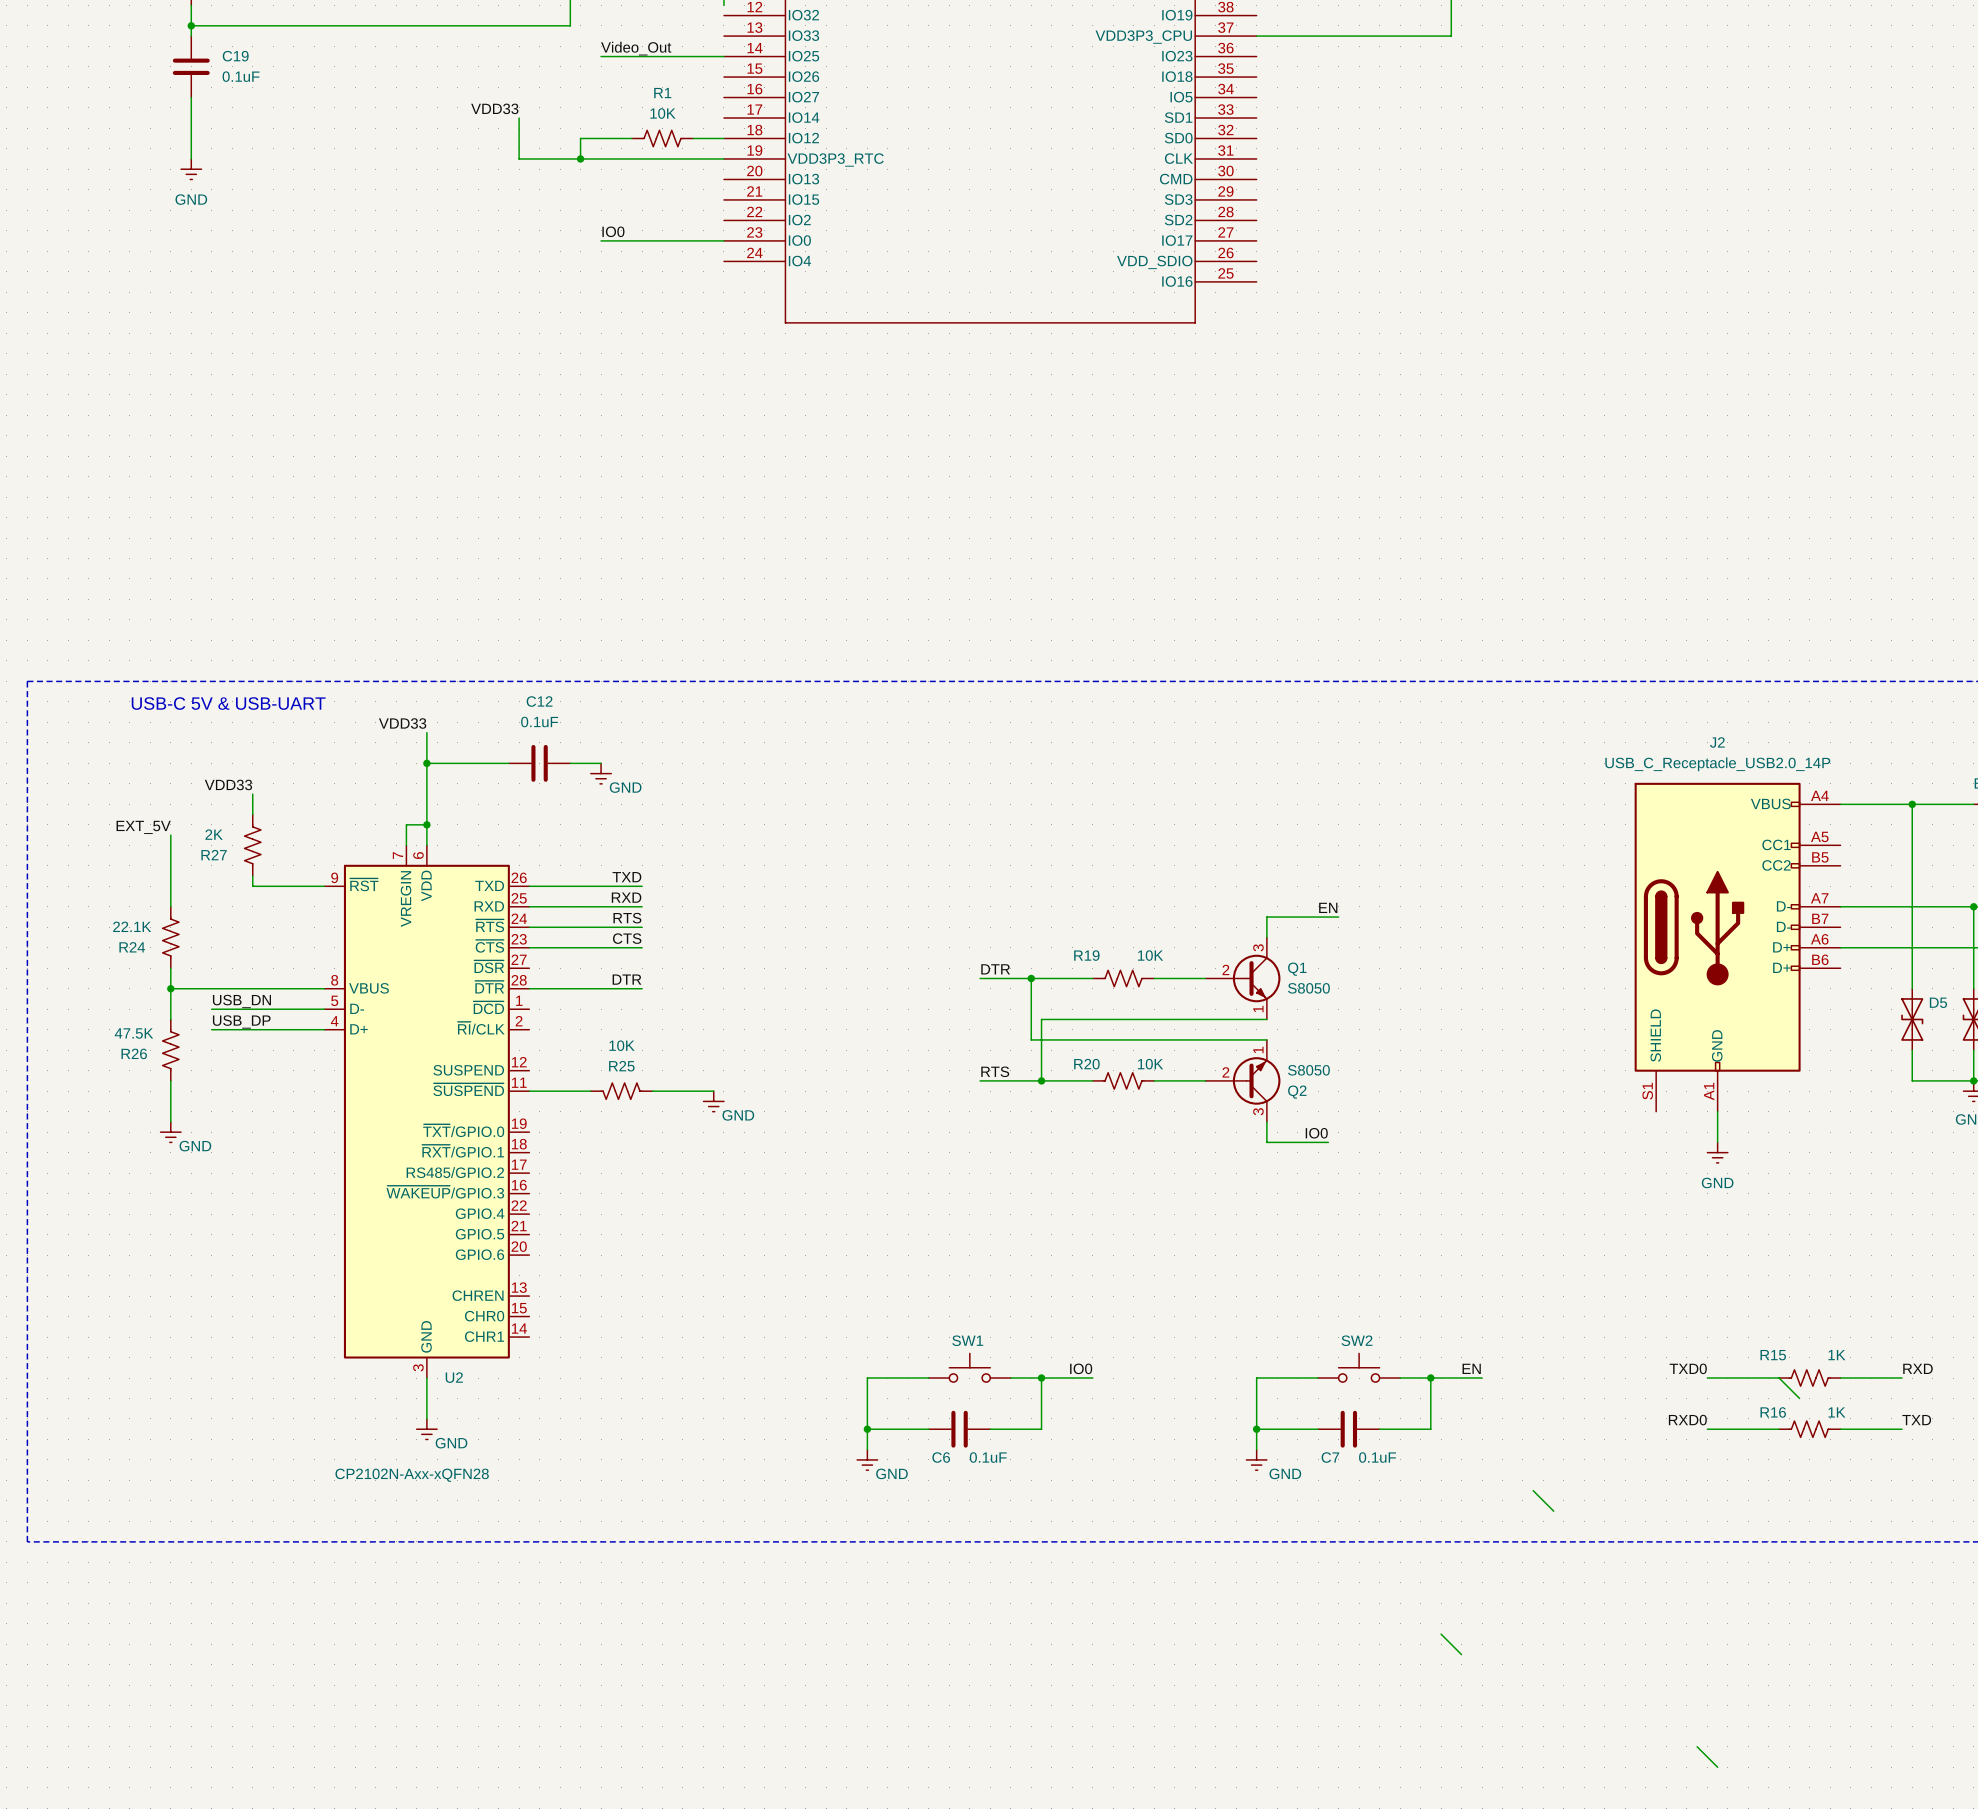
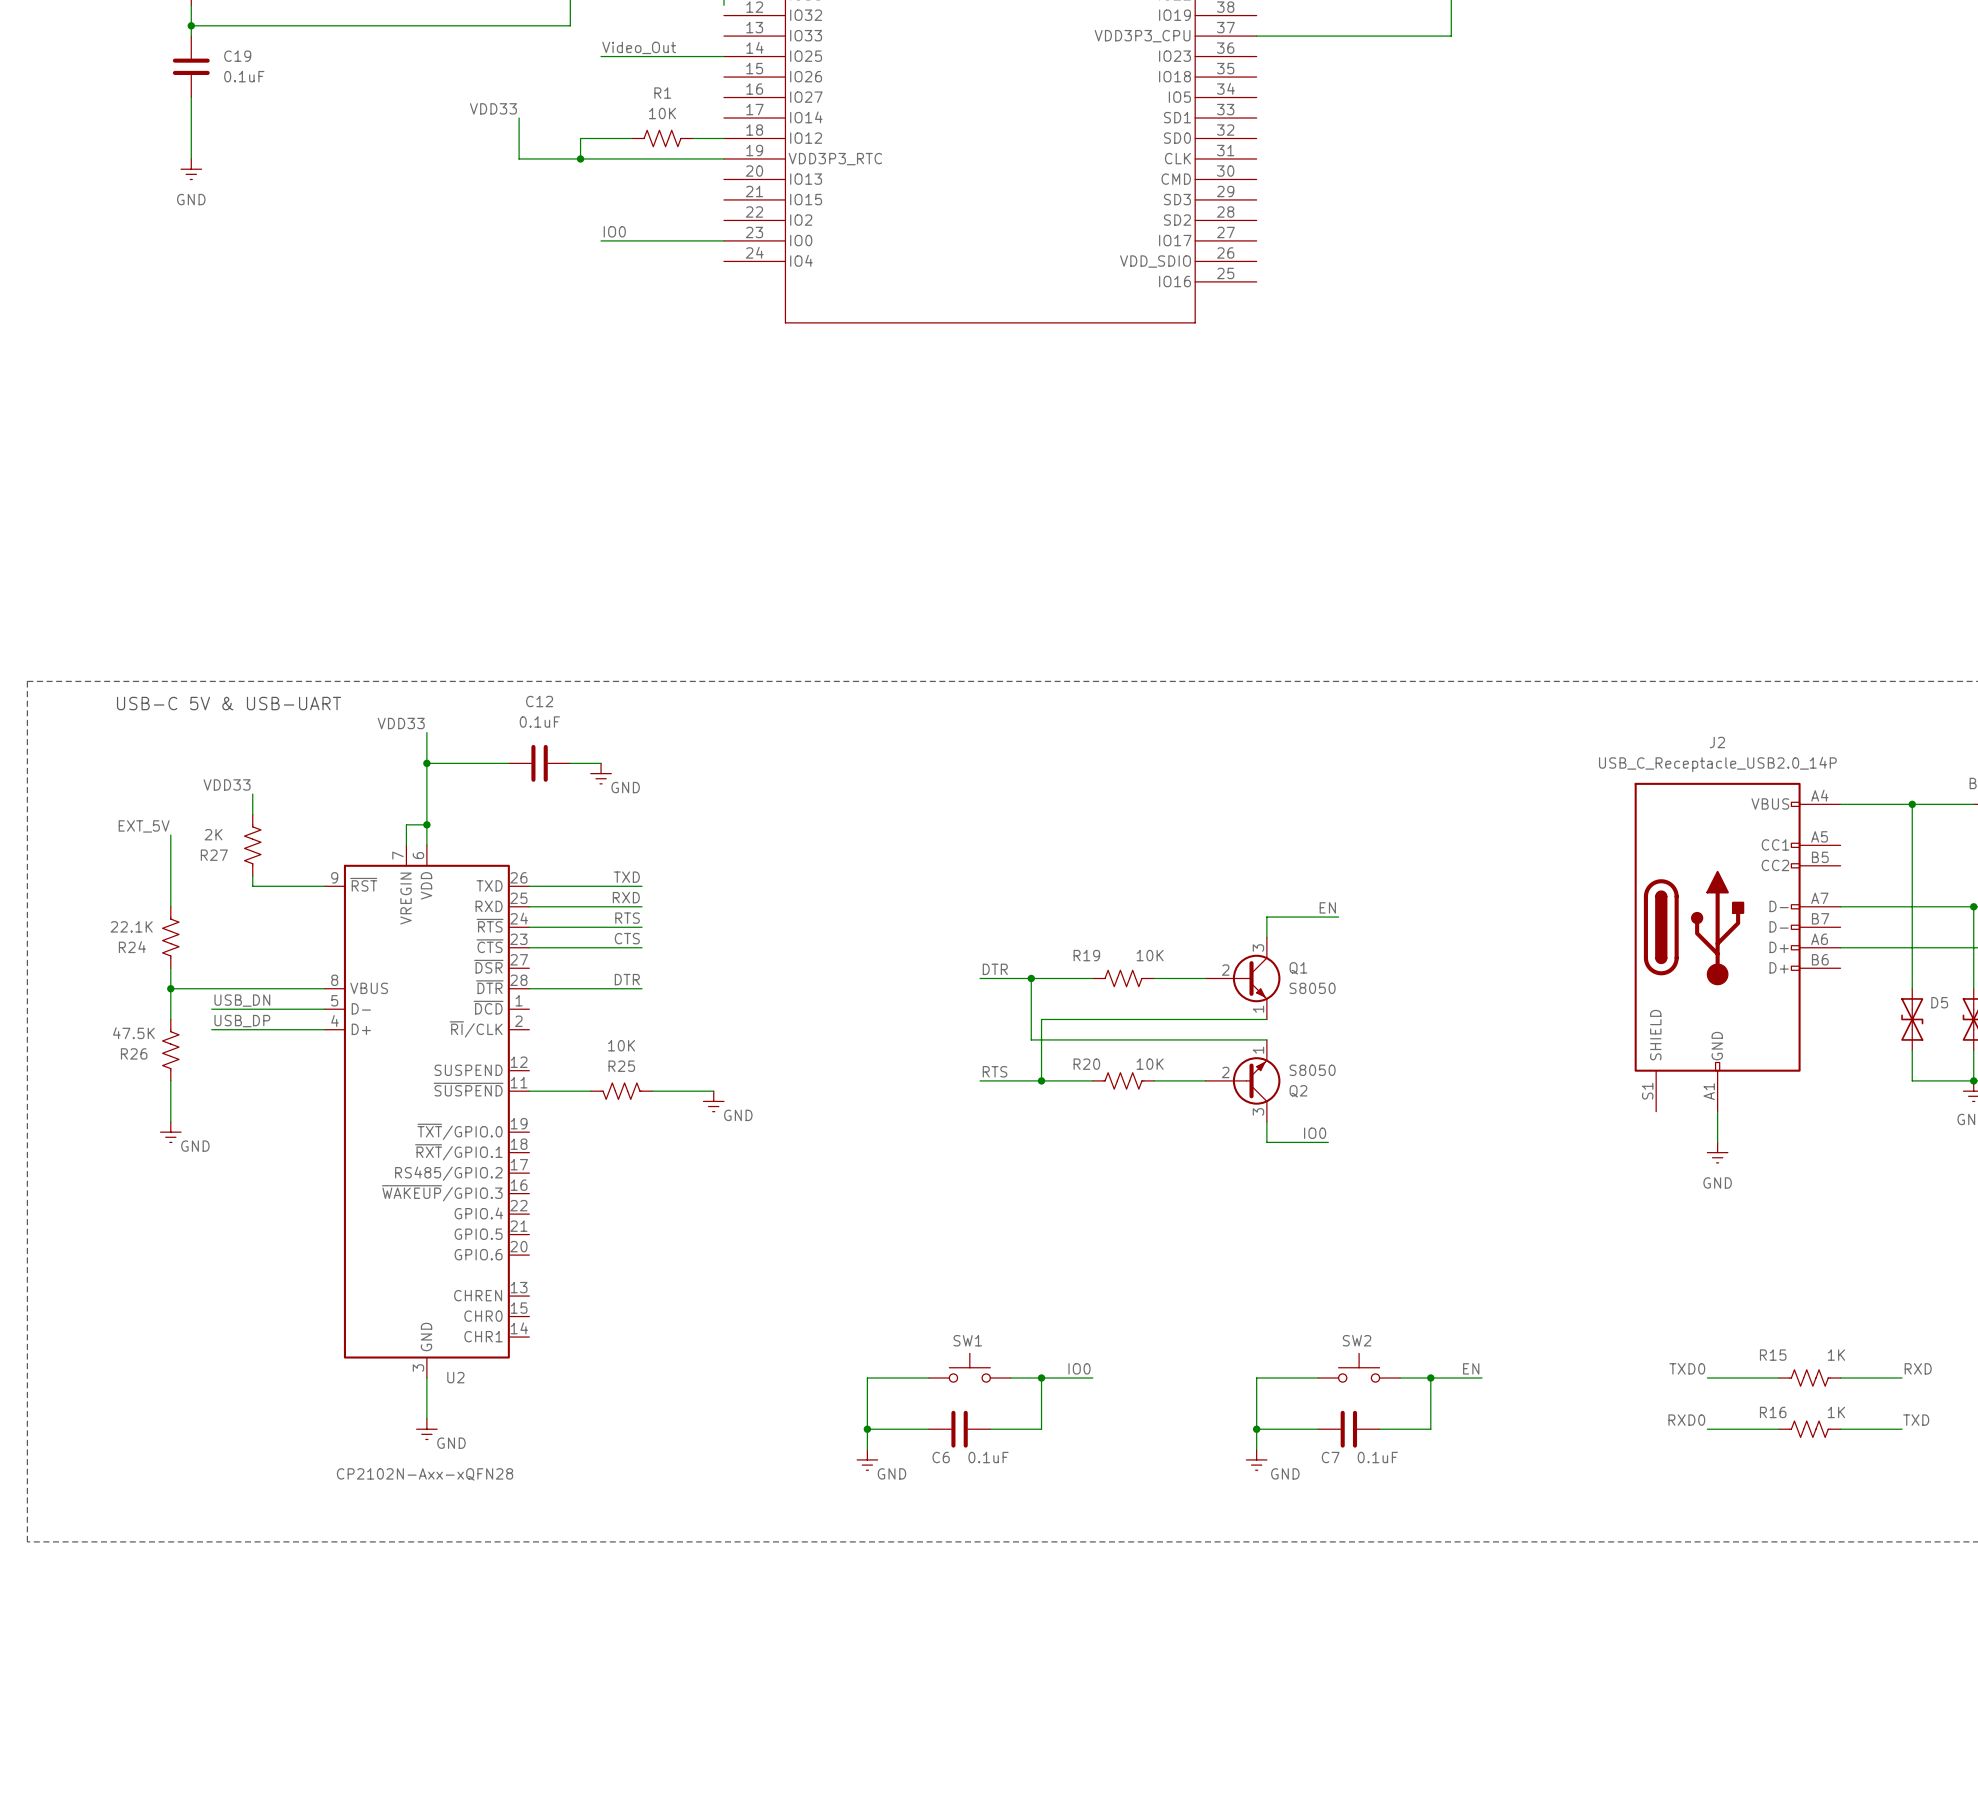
wire: (1779, 1378) (1799, 1398) -> none
wire: (1533, 1490) (1553, 1511) -> none
wire: (1441, 1634) (1461, 1654) -> none
wire: (1697, 1746) (1717, 1767) -> none

